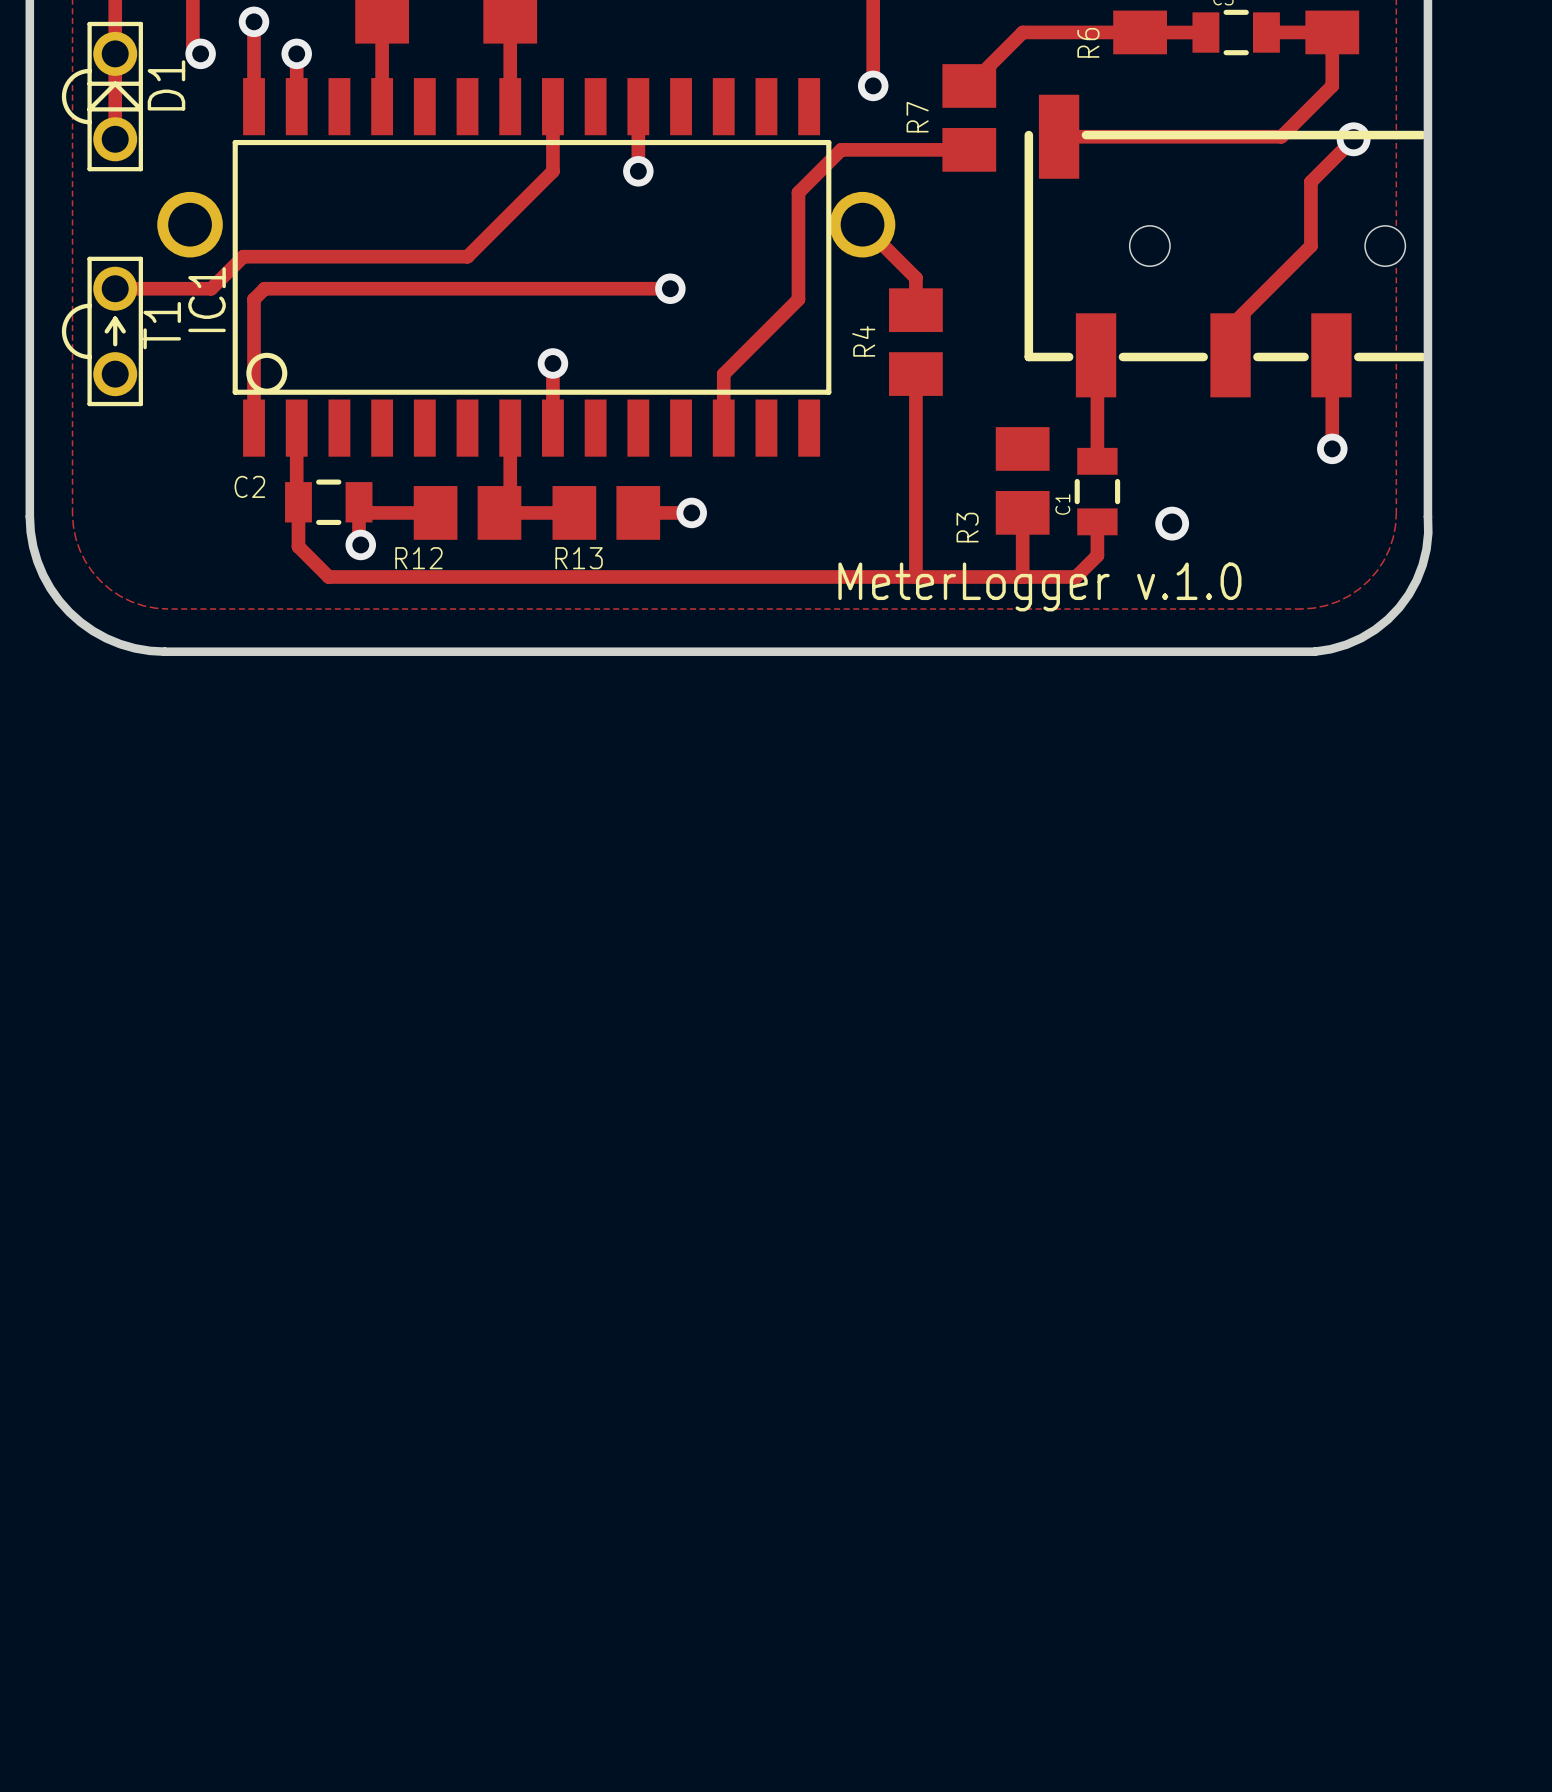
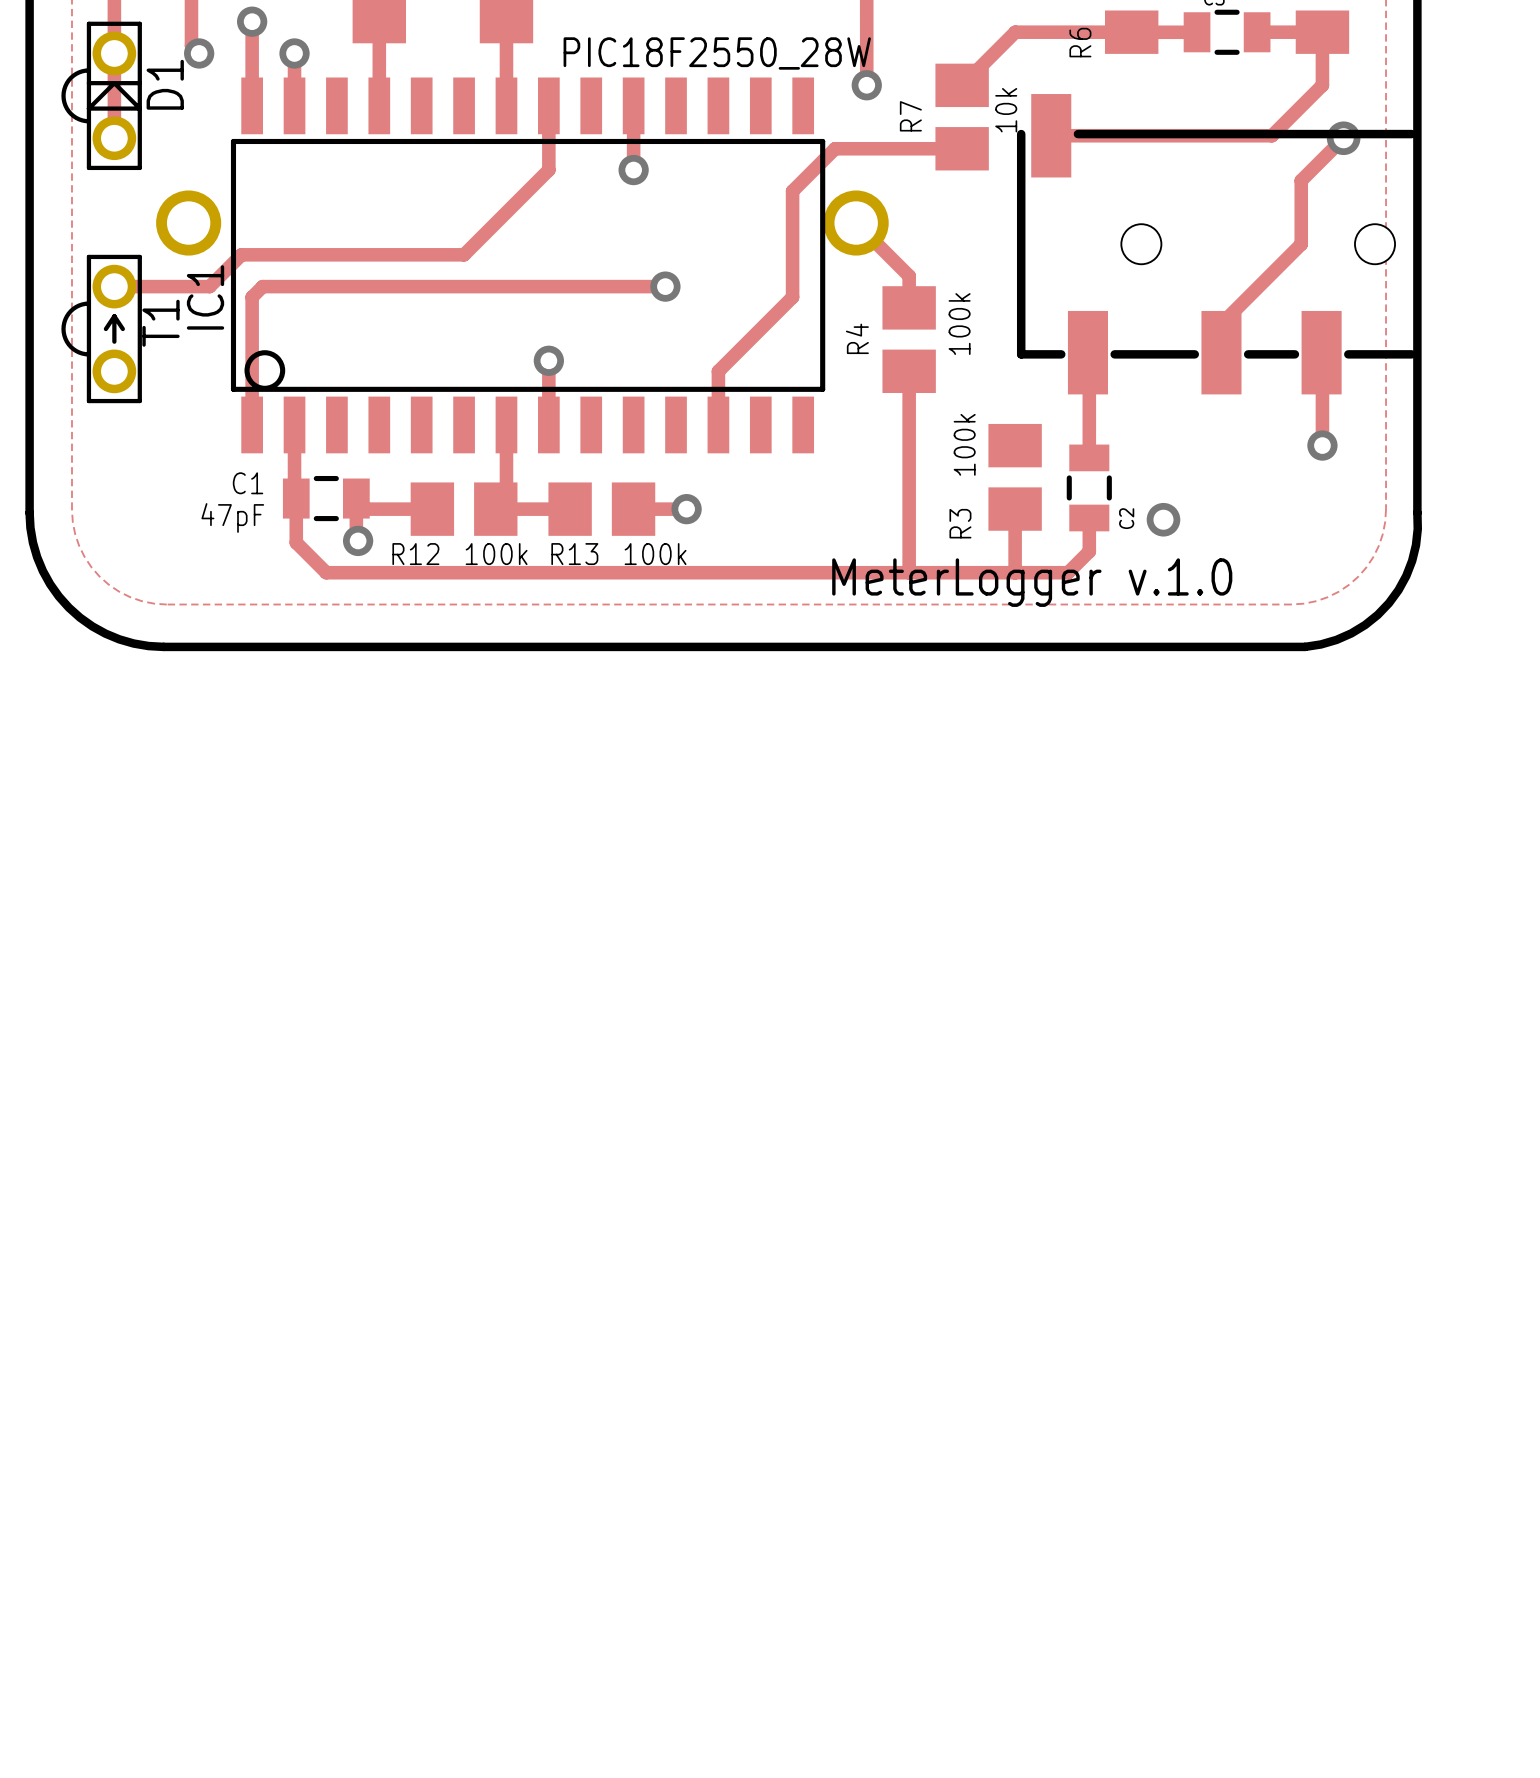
IC1 value: none -> PIC18F2550_28W (717, 53)
R7 value: none -> 10k (1006, 110)
R4 value: none -> 100k (959, 324)
R3 value: none -> 100k (964, 444)
C2 name: C2 (249, 486) -> C1 (248, 483)
C1 name: C1 (1062, 504) -> C2 (1126, 518)
C2 value: none -> 47pF (232, 517)
R12 value: none -> 100k (496, 554)
R13 value: none -> 100k (655, 554)

